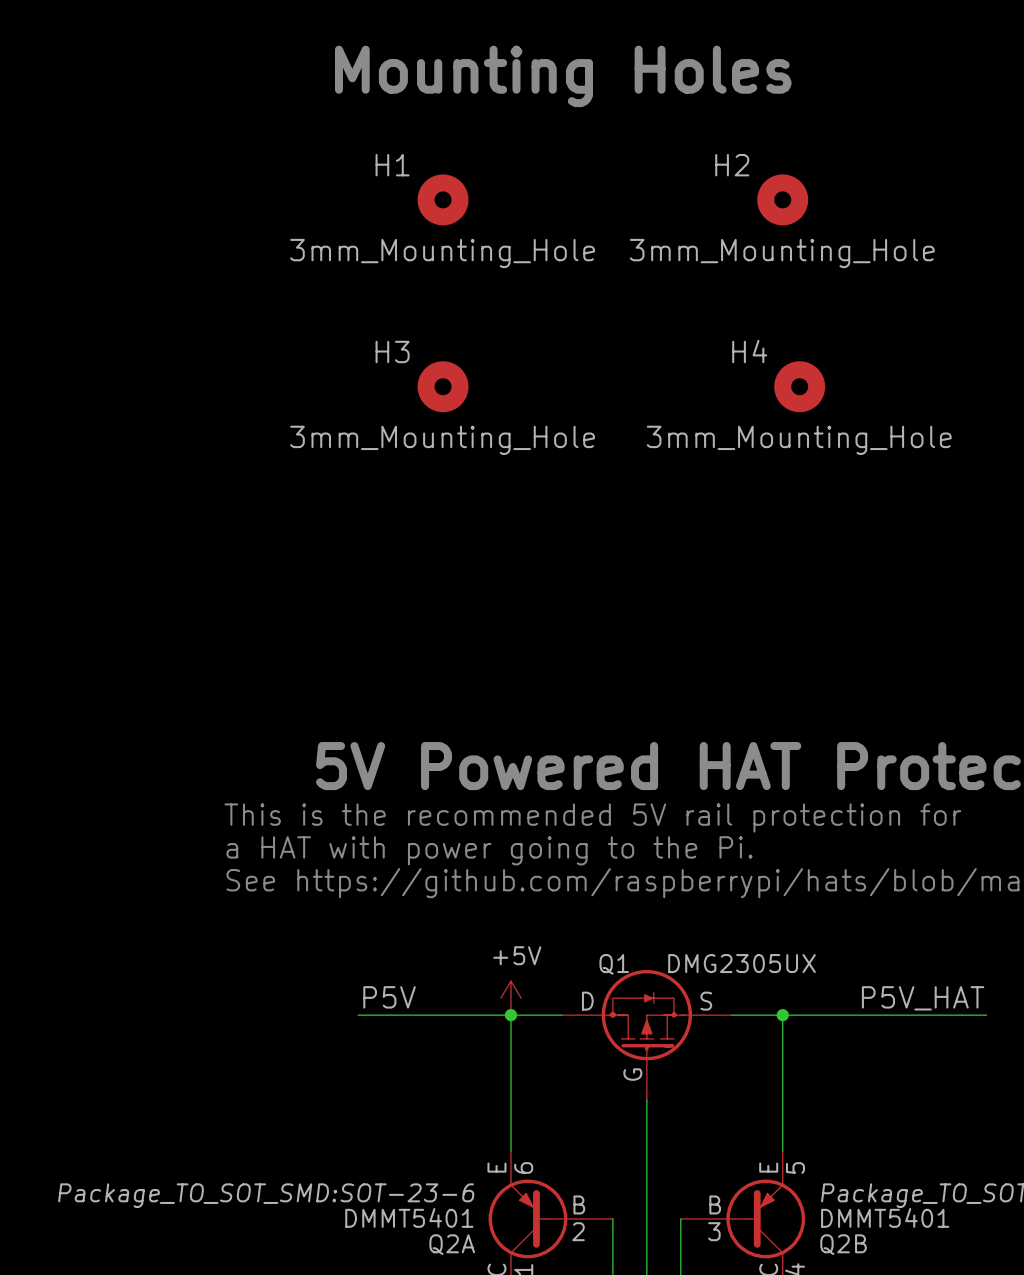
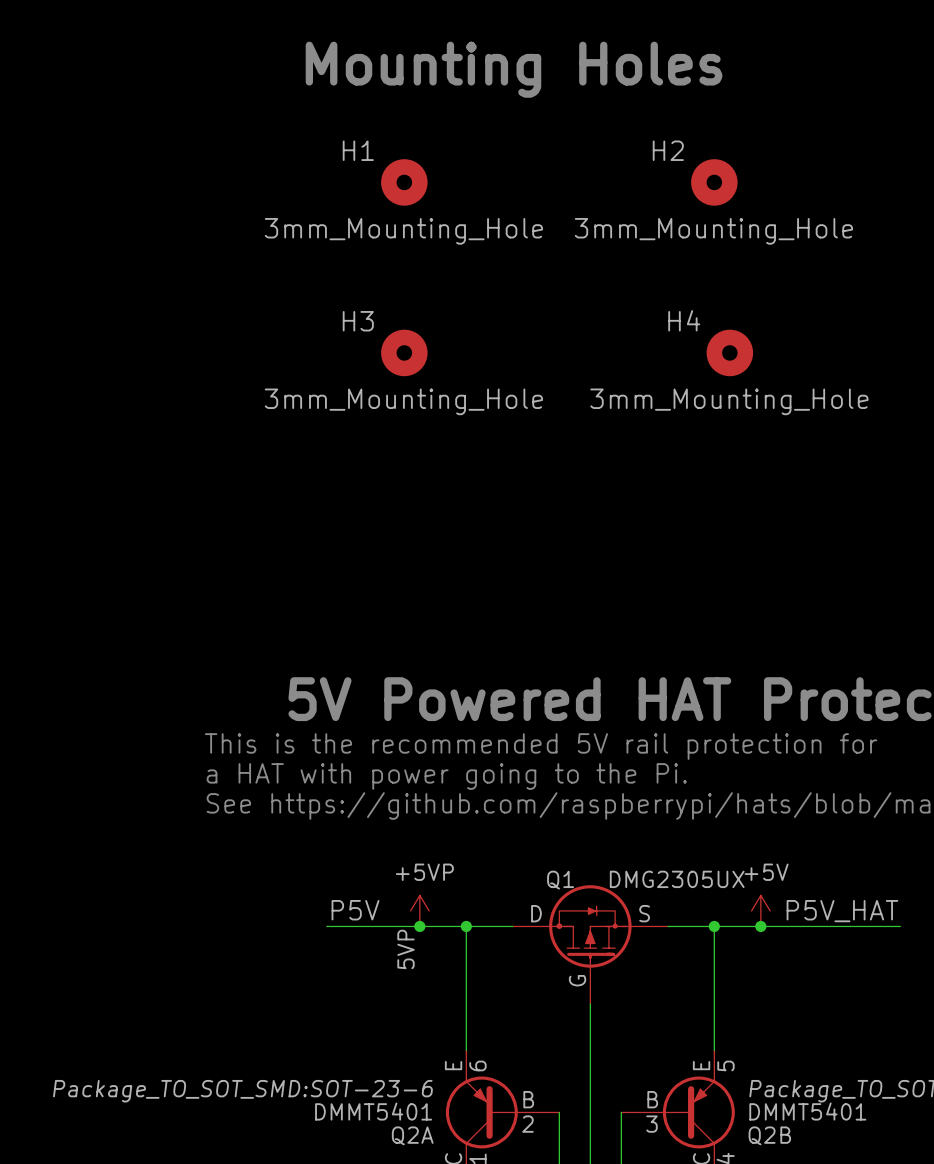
power symbol: none -> +5VP (419, 910)
power symbol position: +5V (510, 998) -> +5V (760, 910)
junction: none -> (419, 926)
junction: none -> (760, 926)
label: none -> 5VP (406, 949)

